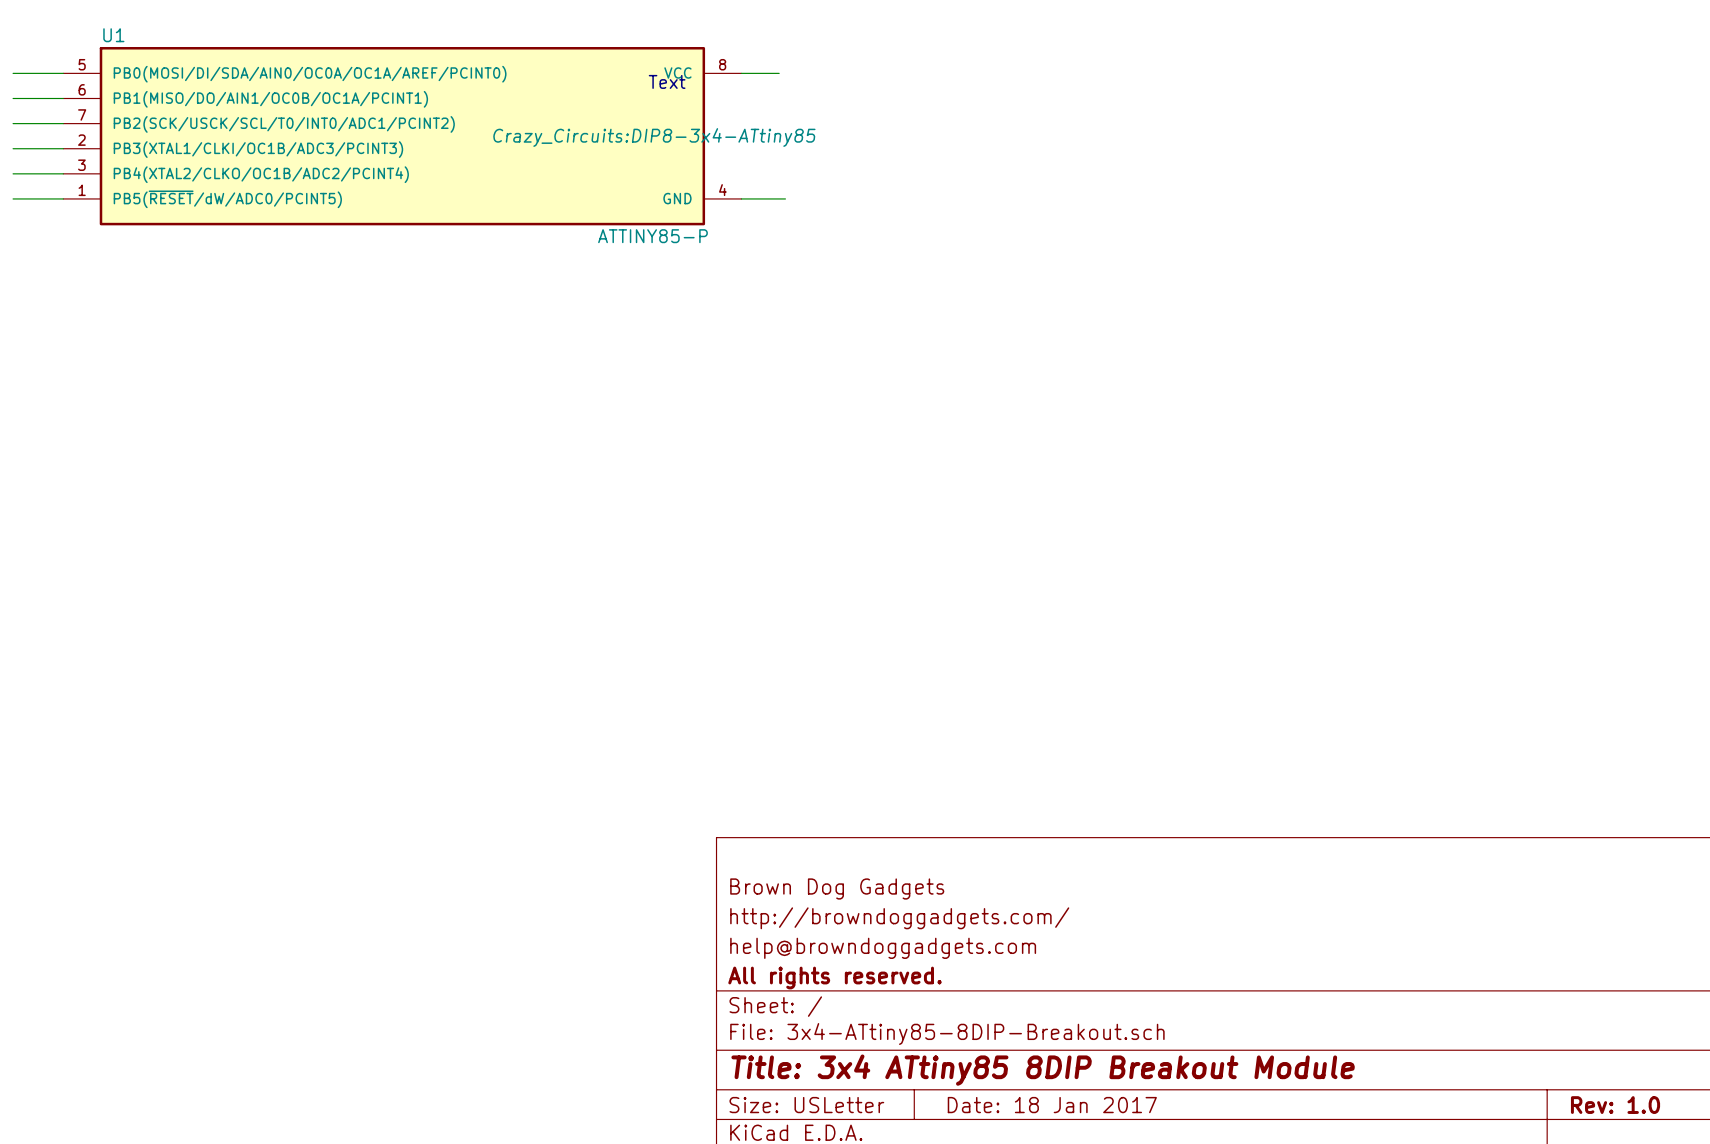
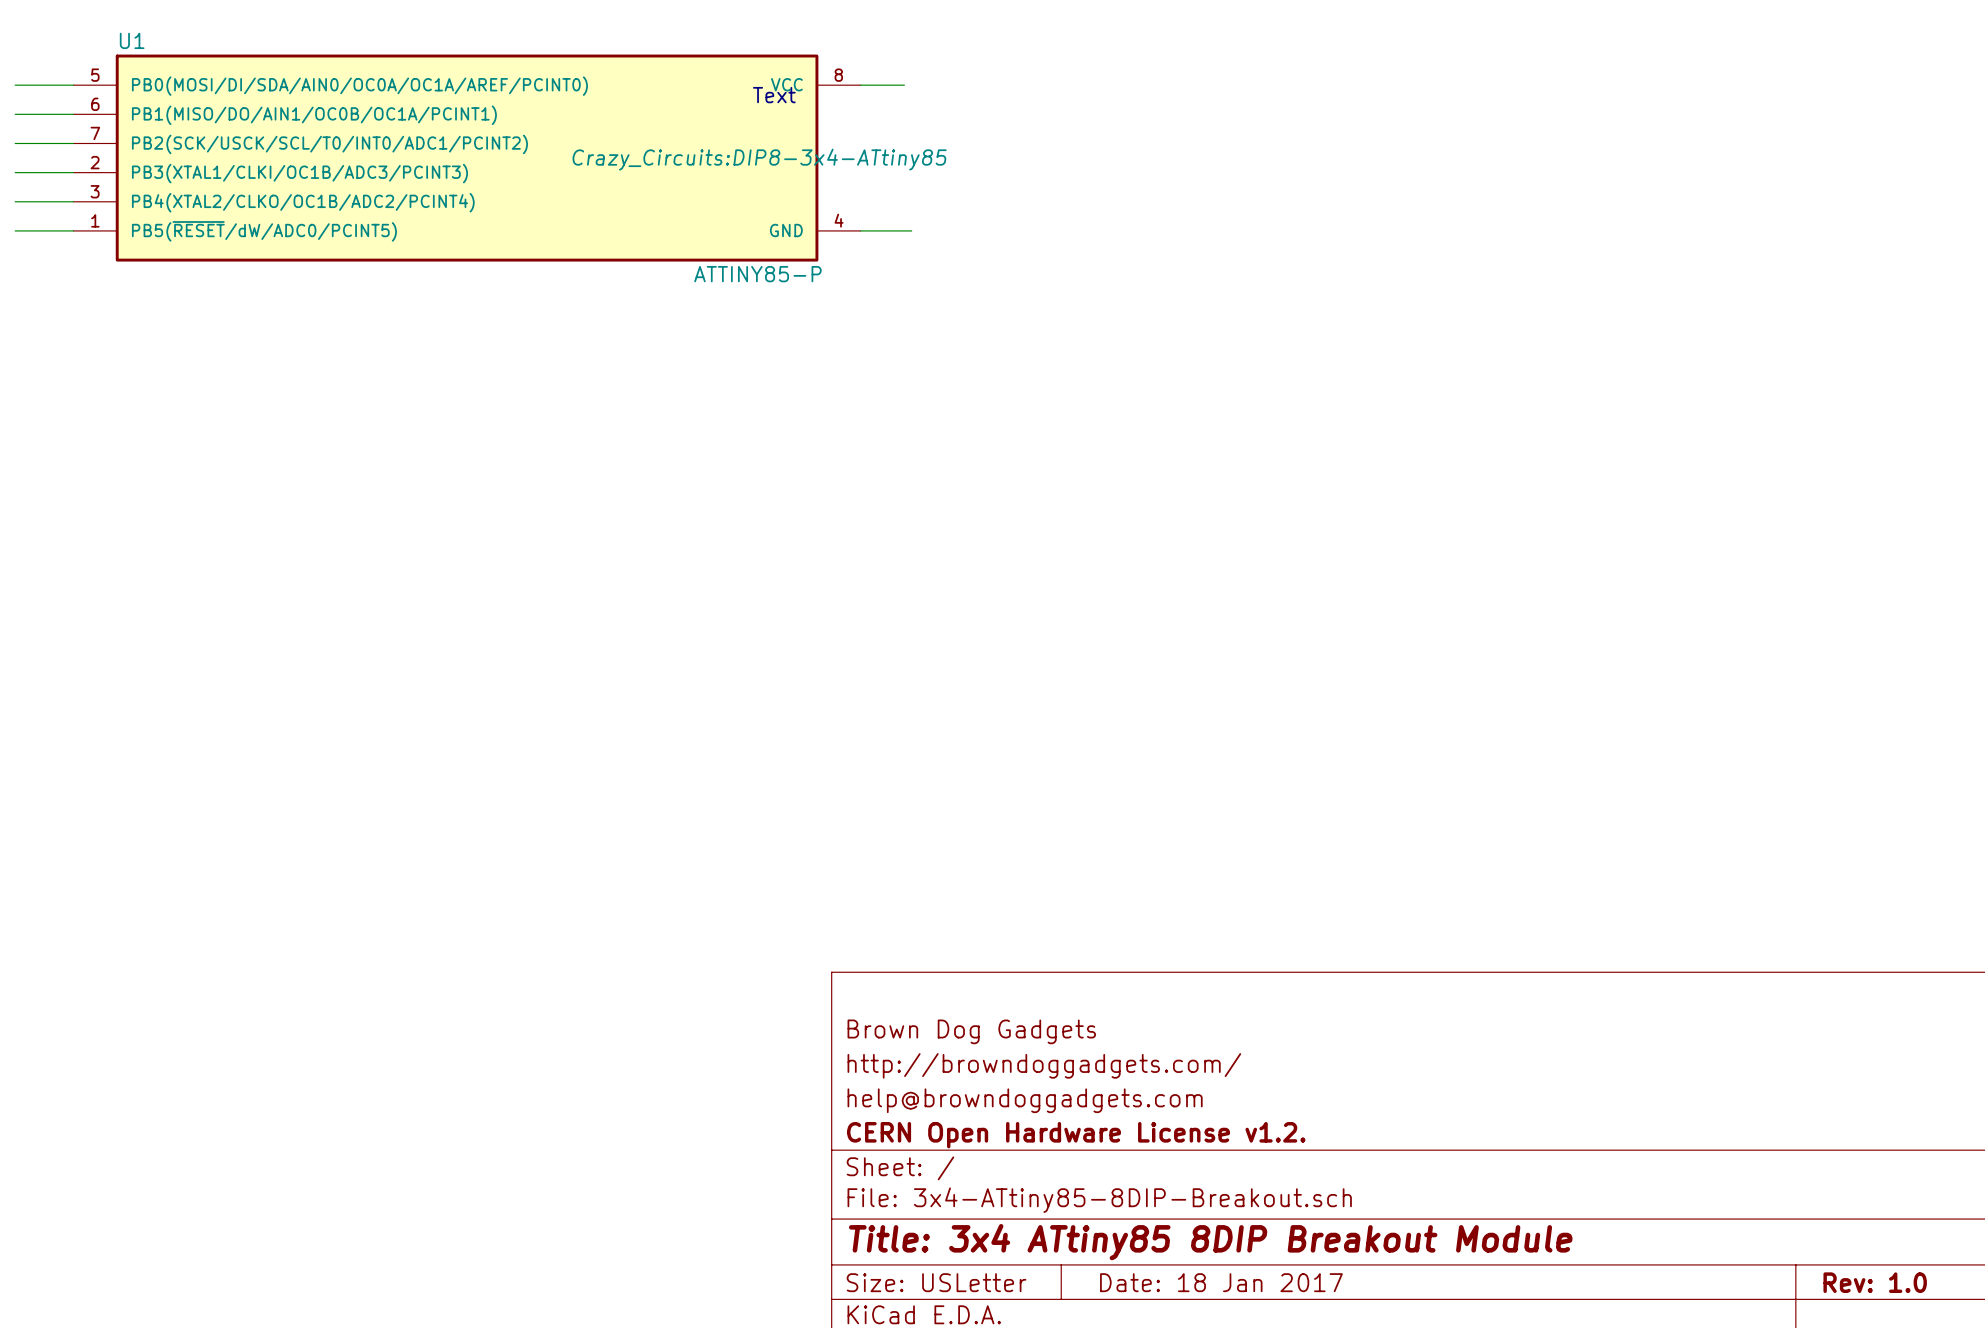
title block: All rights reserved. (835, 977) -> CERN Open Hardware License v1.2. (1076, 1135)

